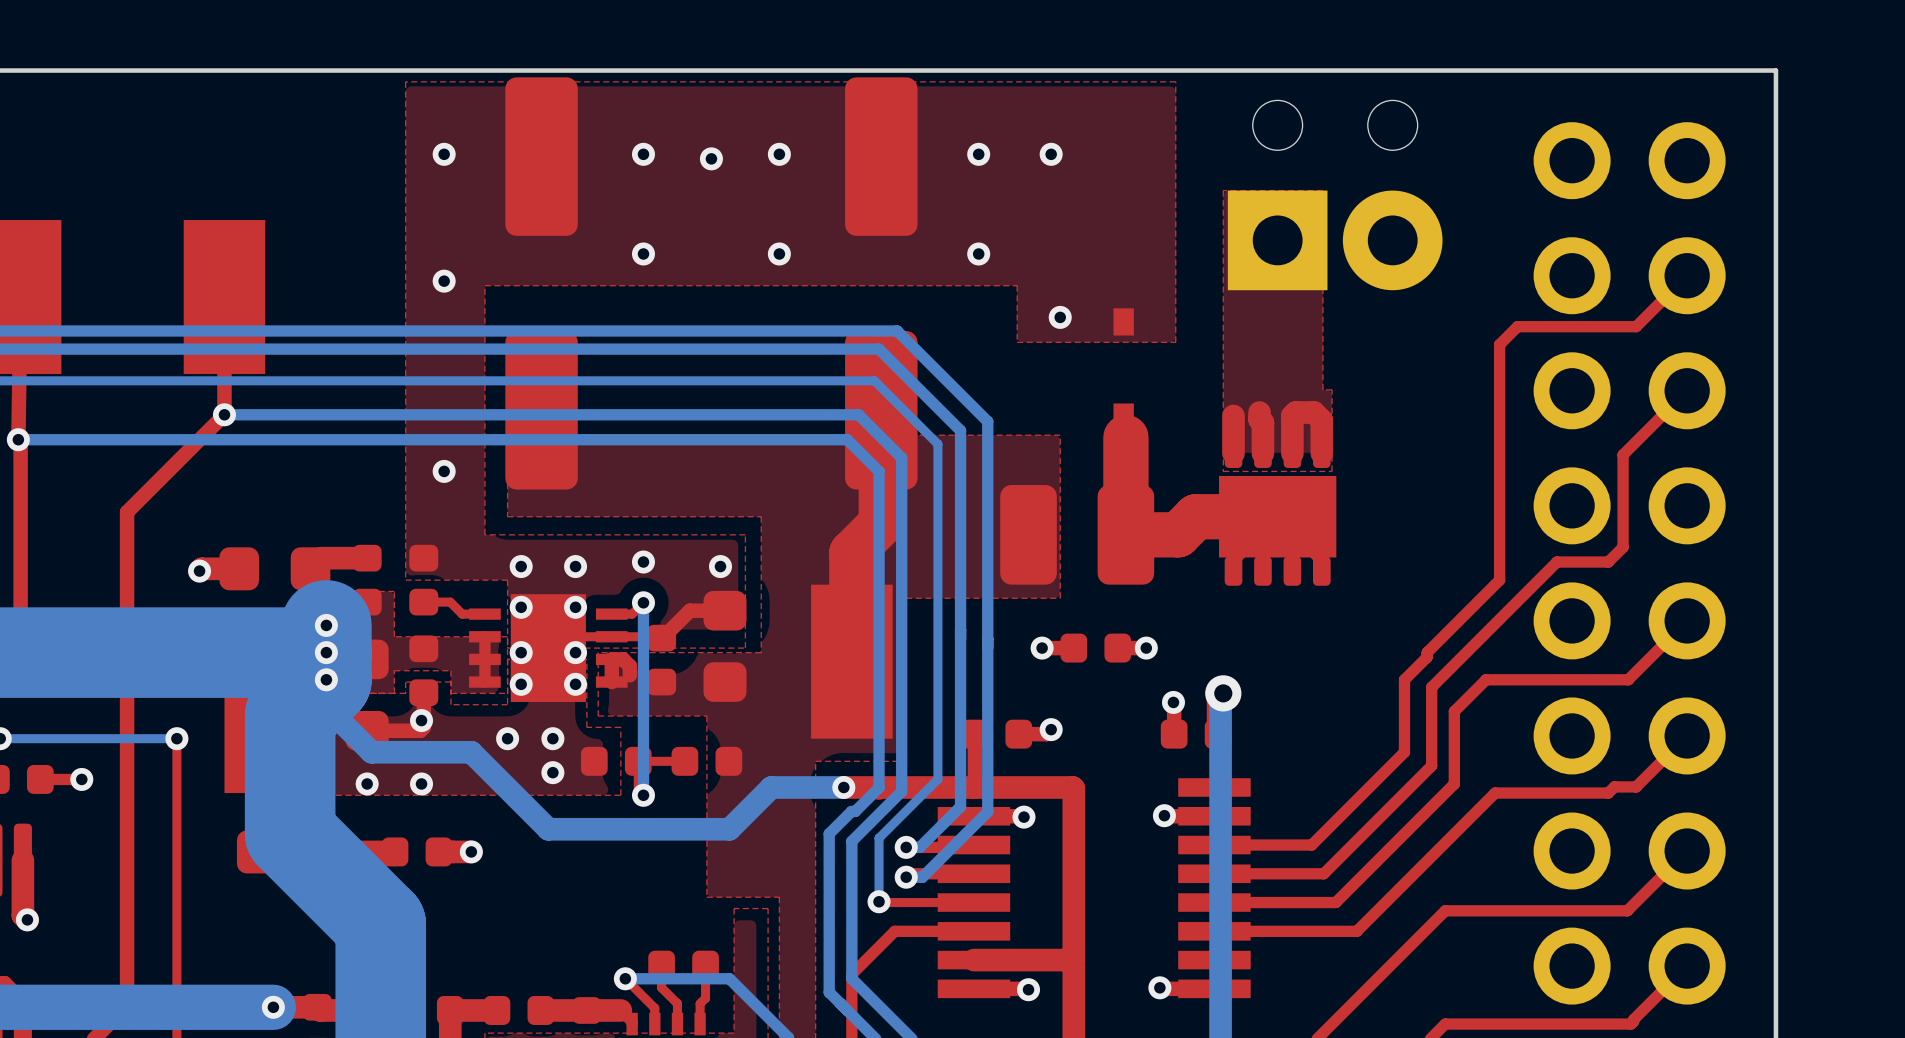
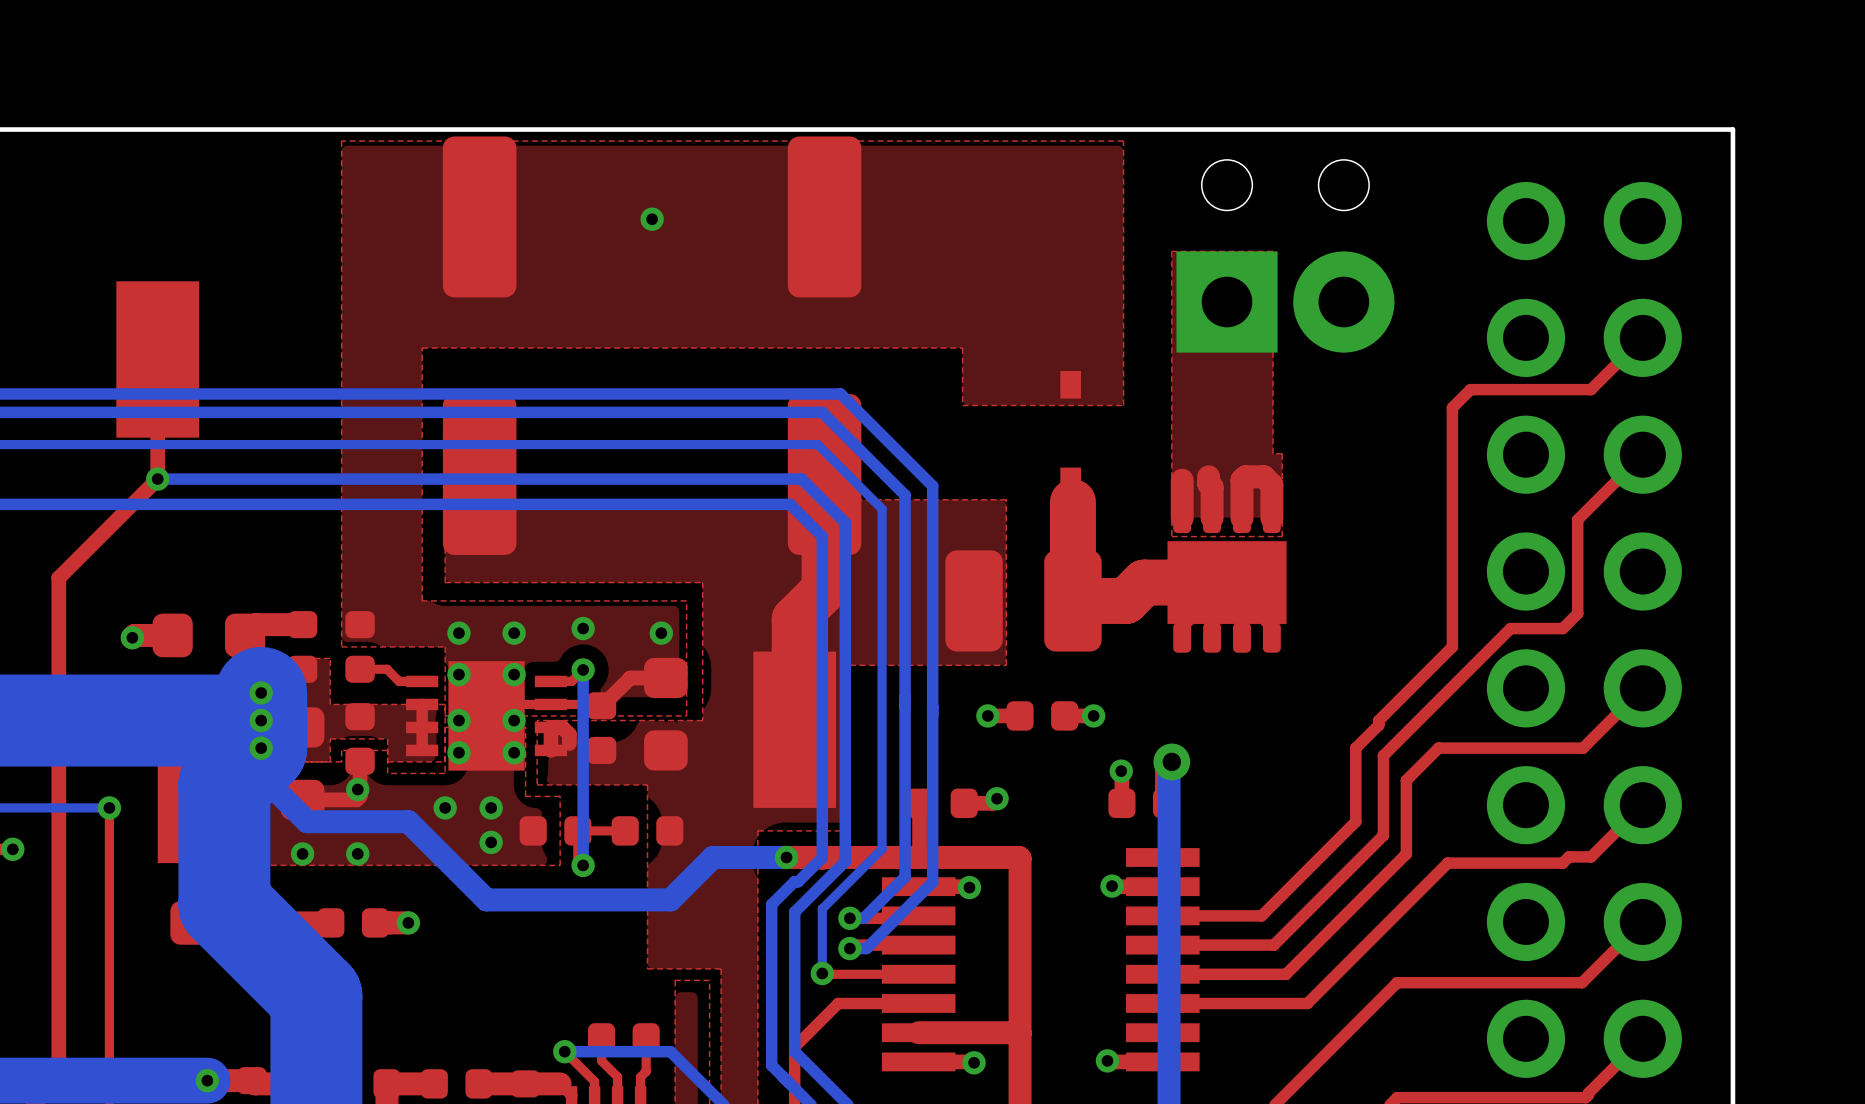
via: (444, 154) -> none
via: (643, 154) -> none
via: (779, 154) -> none
via: (978, 154) -> none
via: (1051, 154) -> none
via: (643, 253) -> none
via: (779, 253) -> none
via: (978, 253) -> none
via: (444, 281) -> none
via: (1060, 317) -> none
via: (444, 471) -> none

